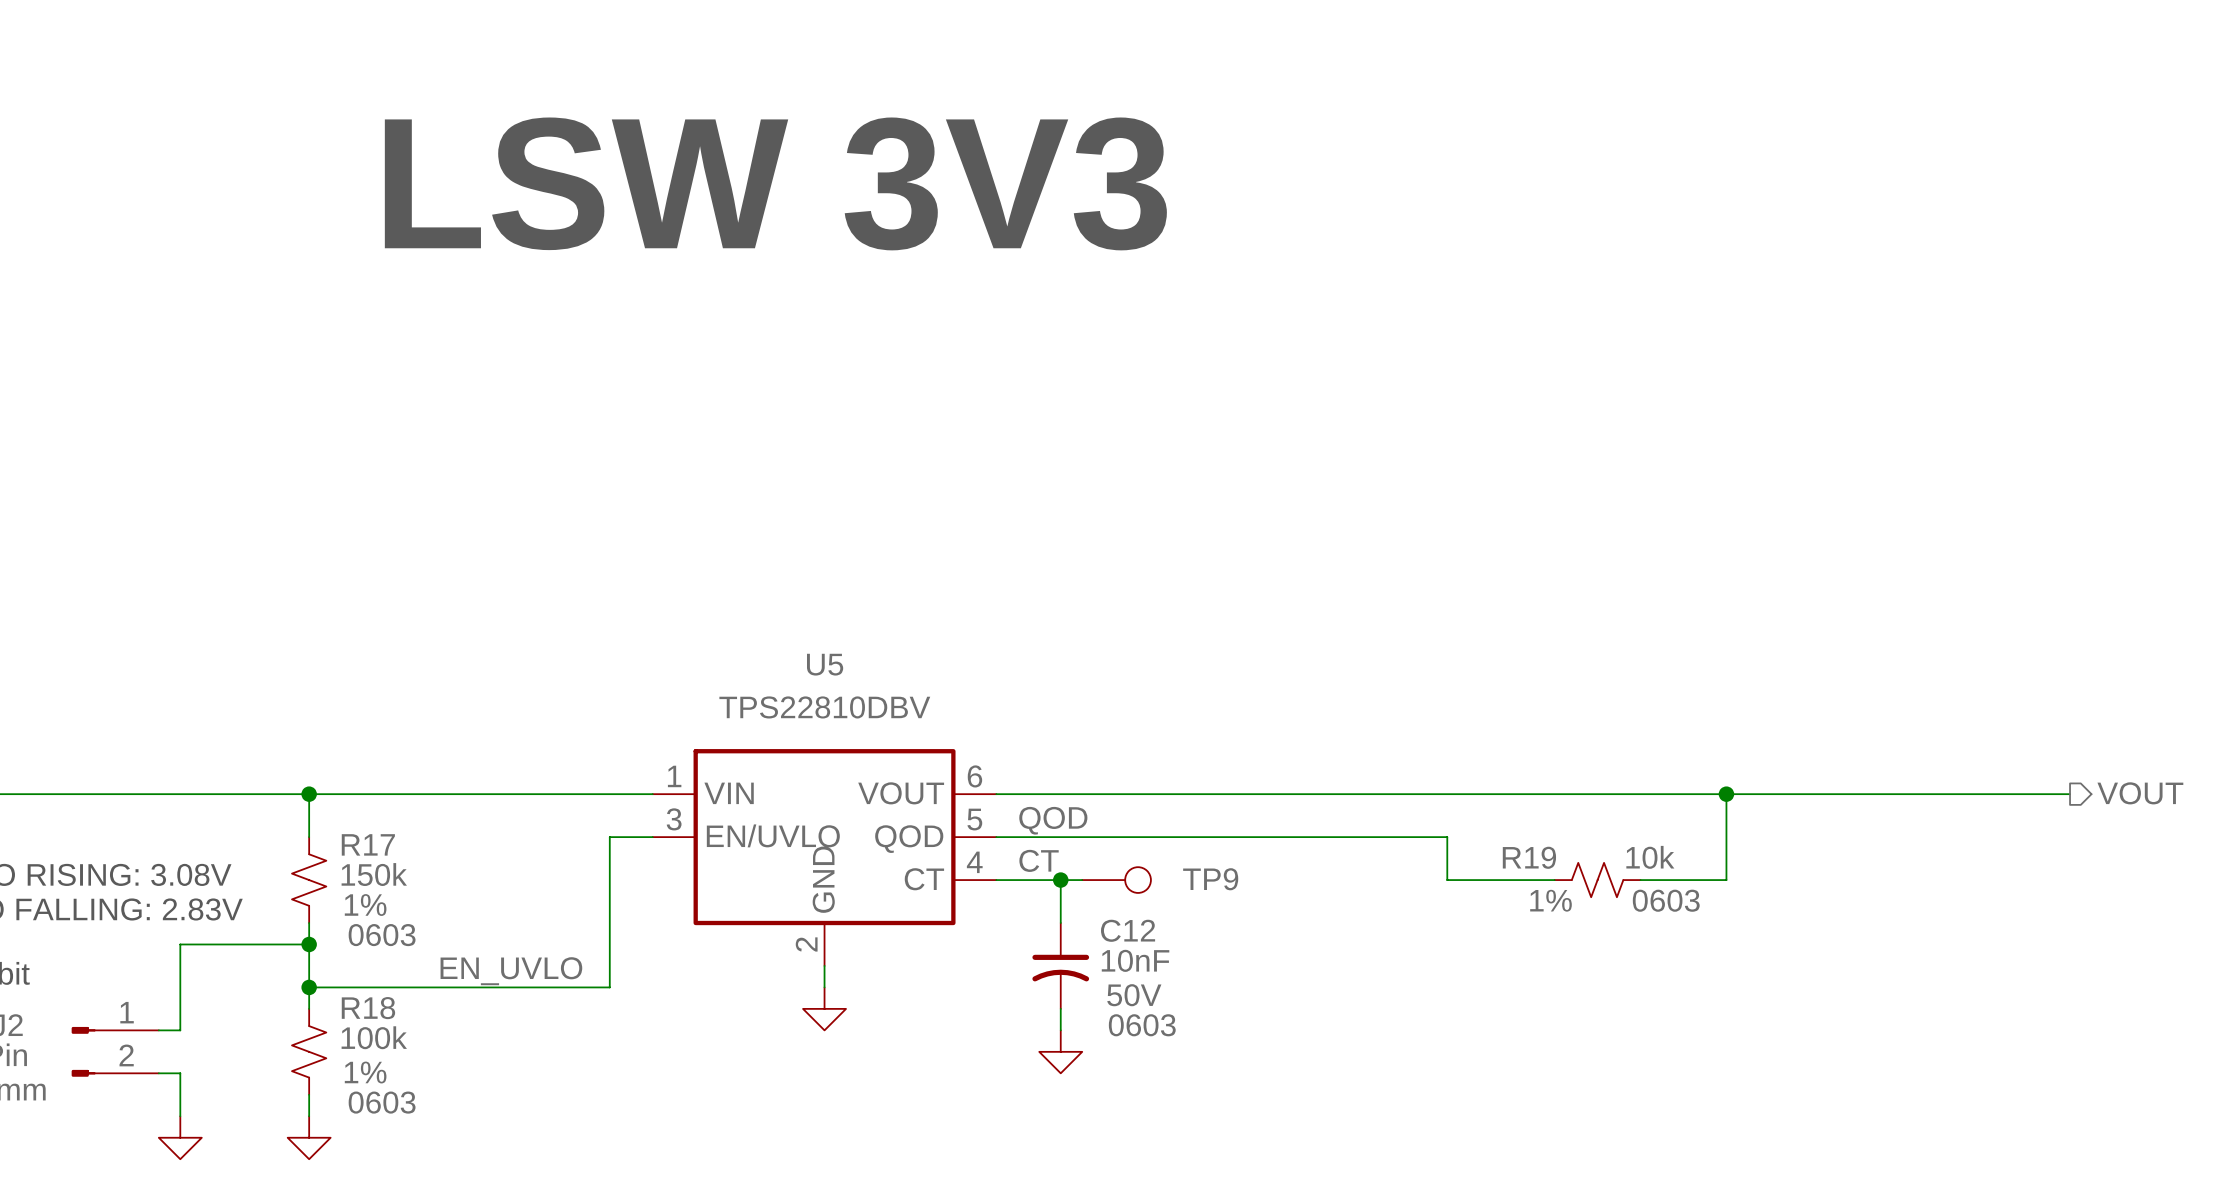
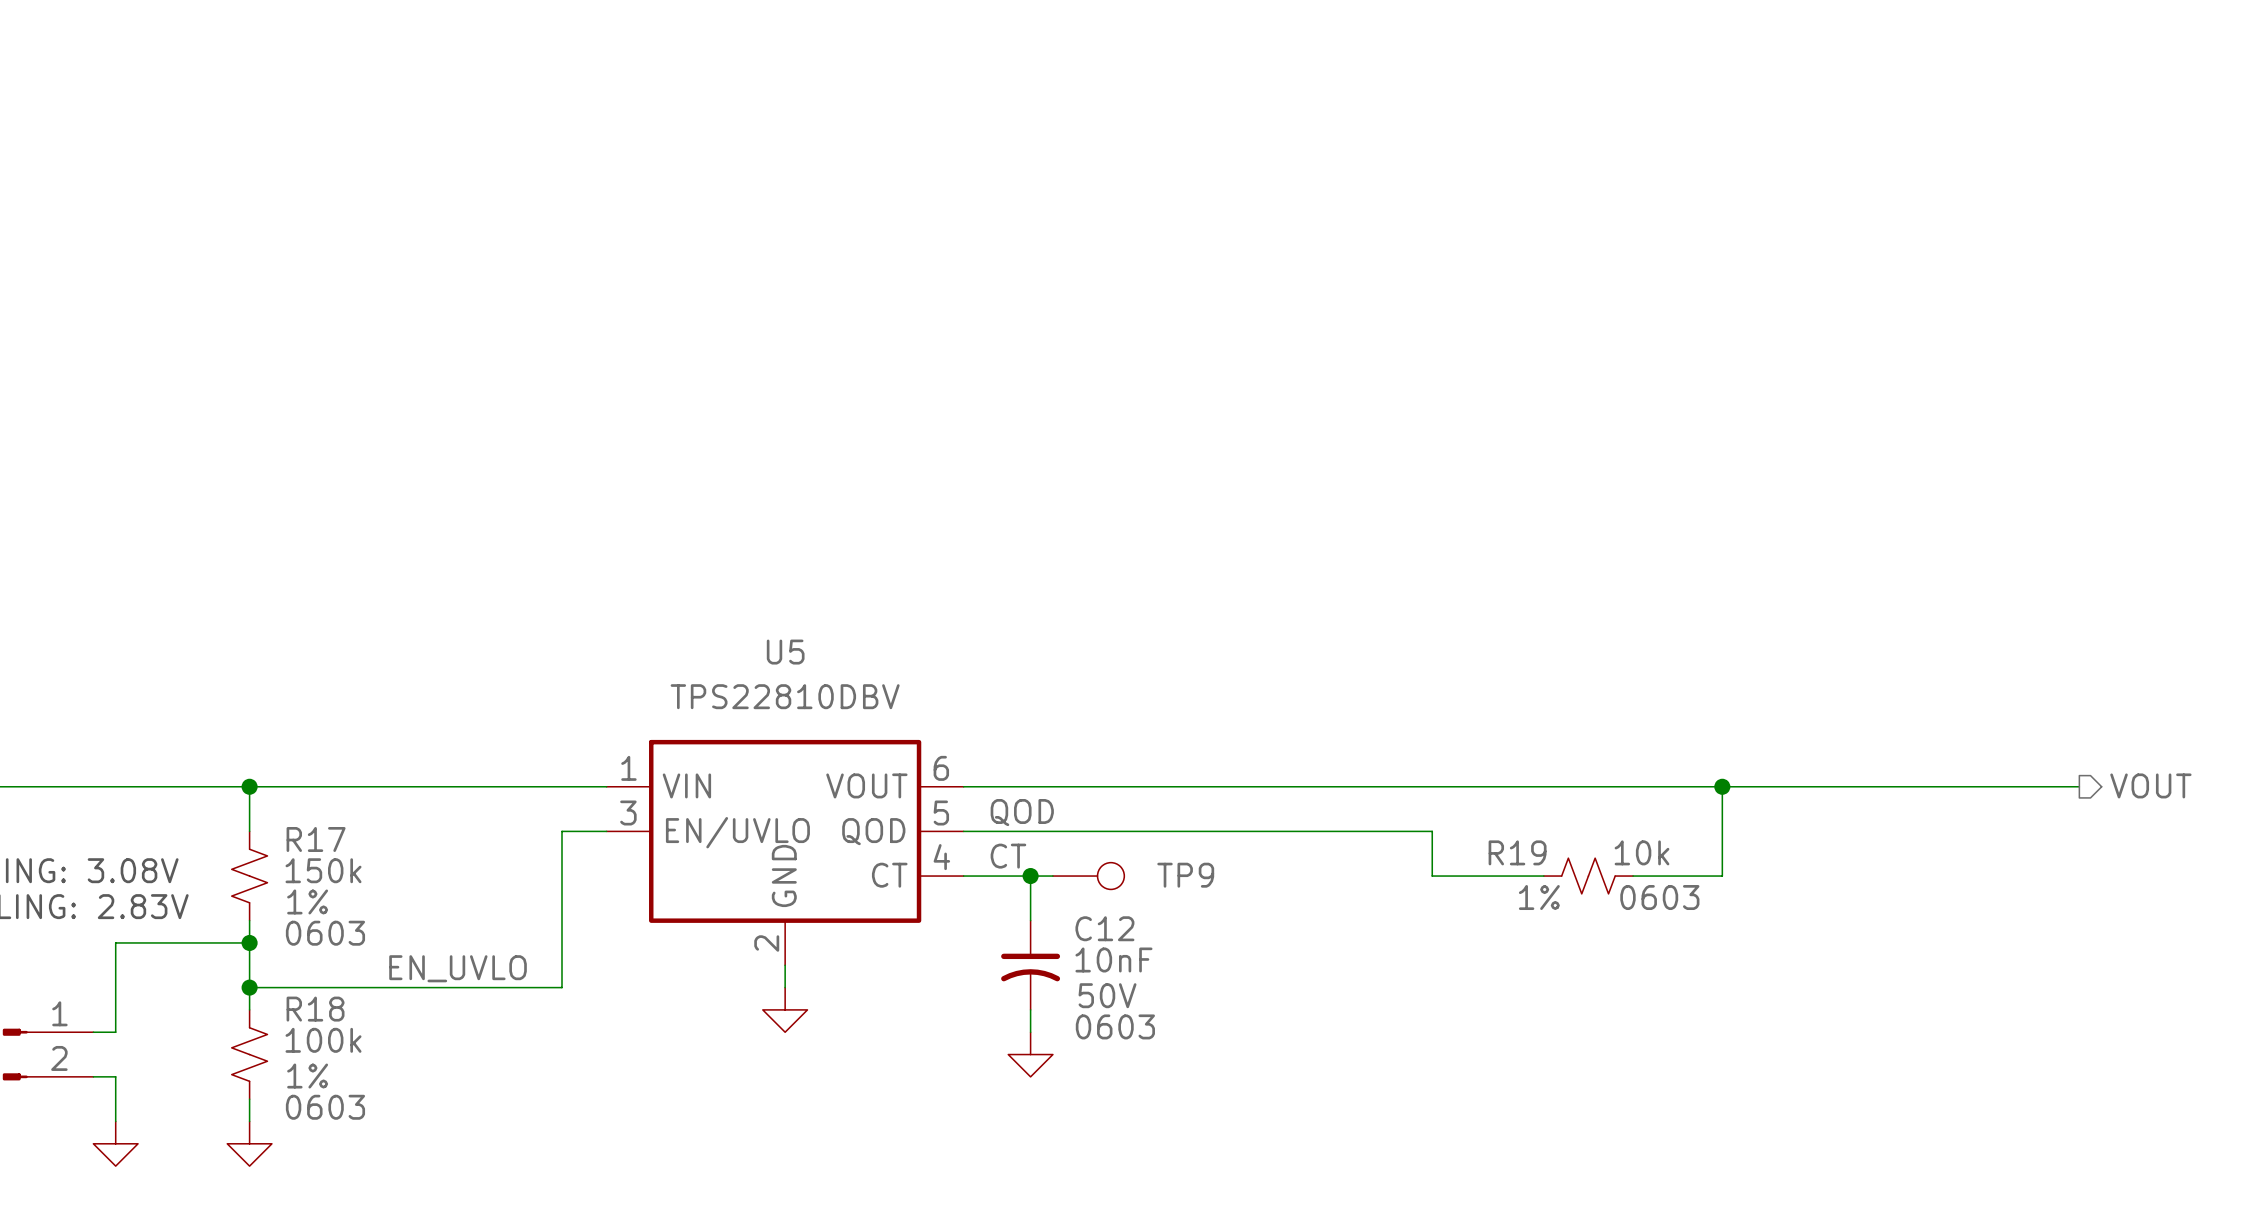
text: LSW 3V3 (775, 183) -> none

